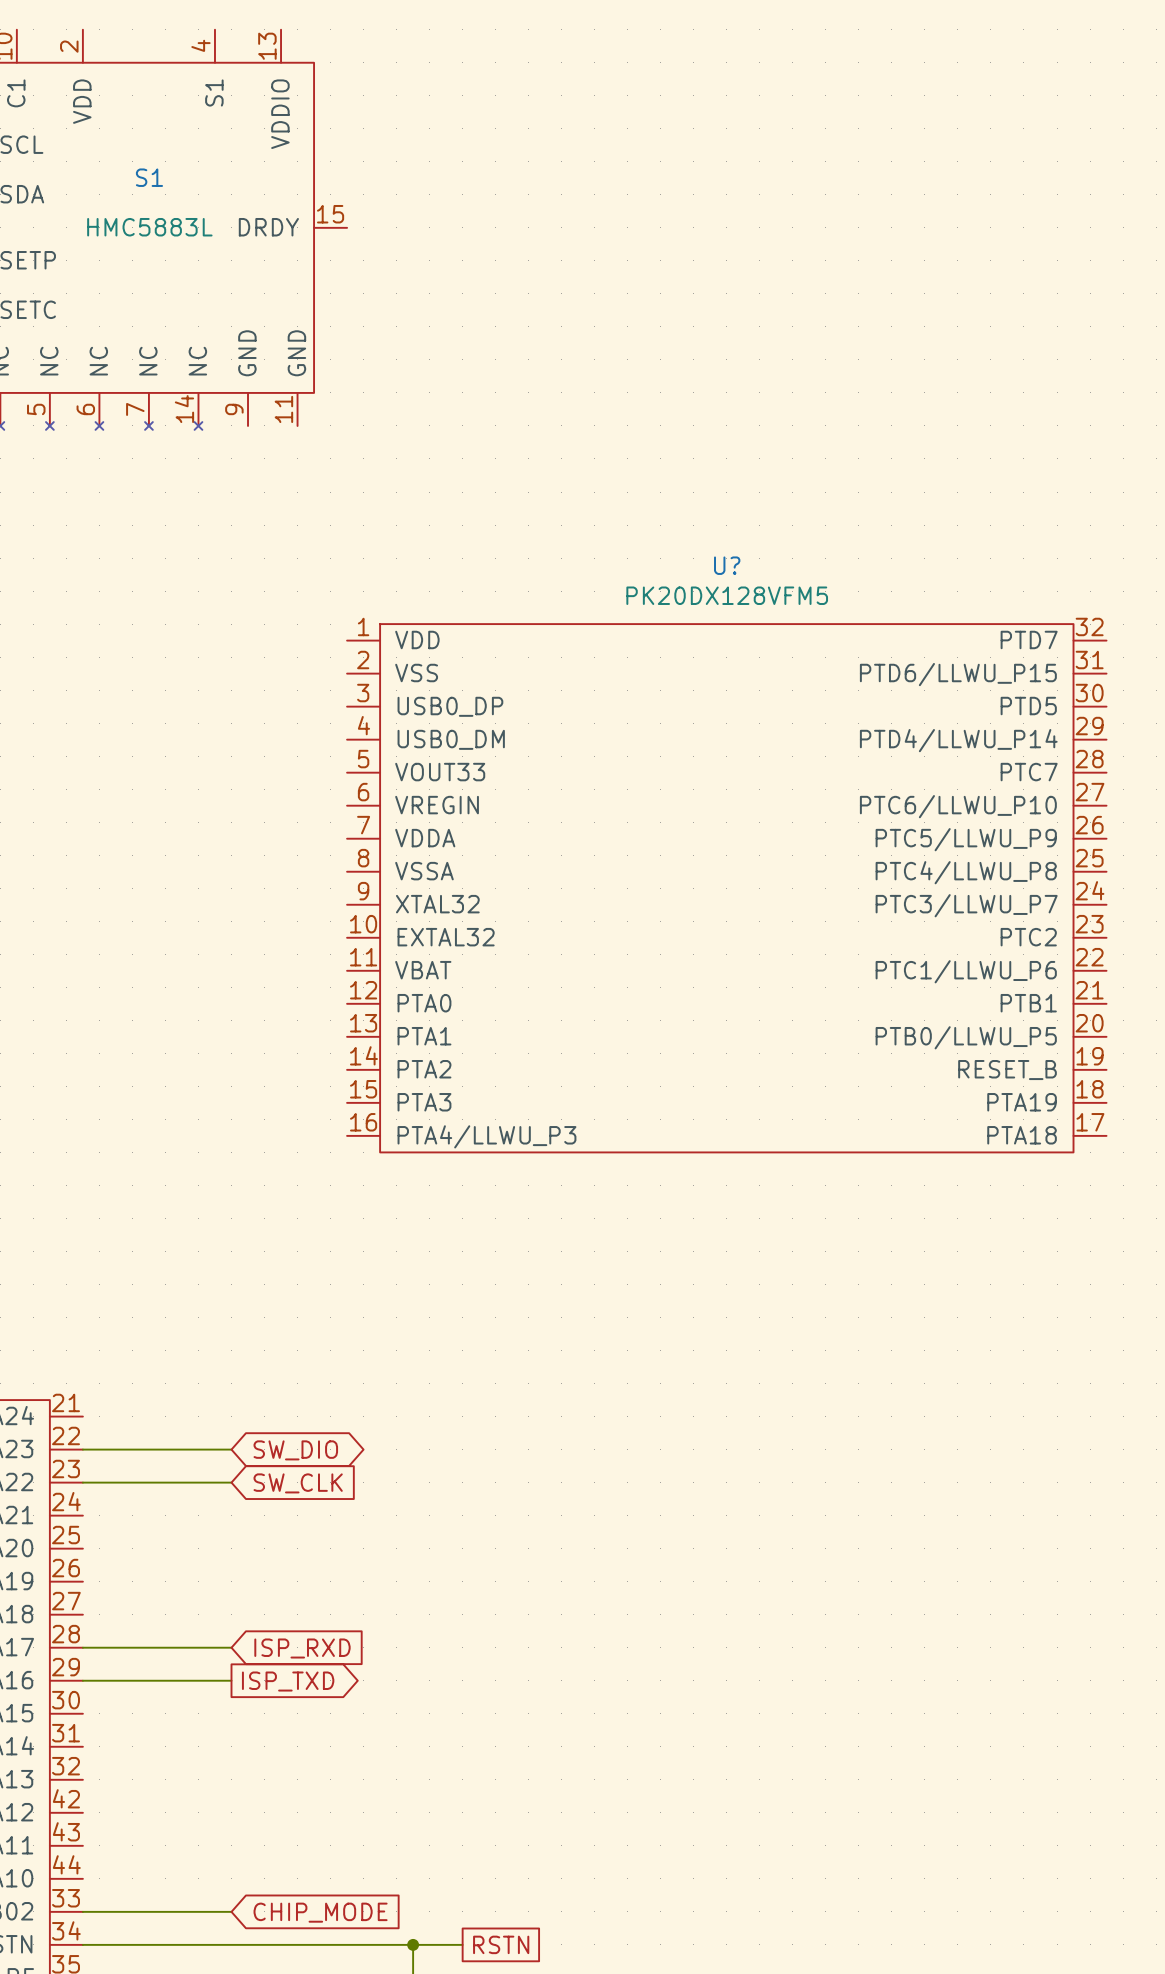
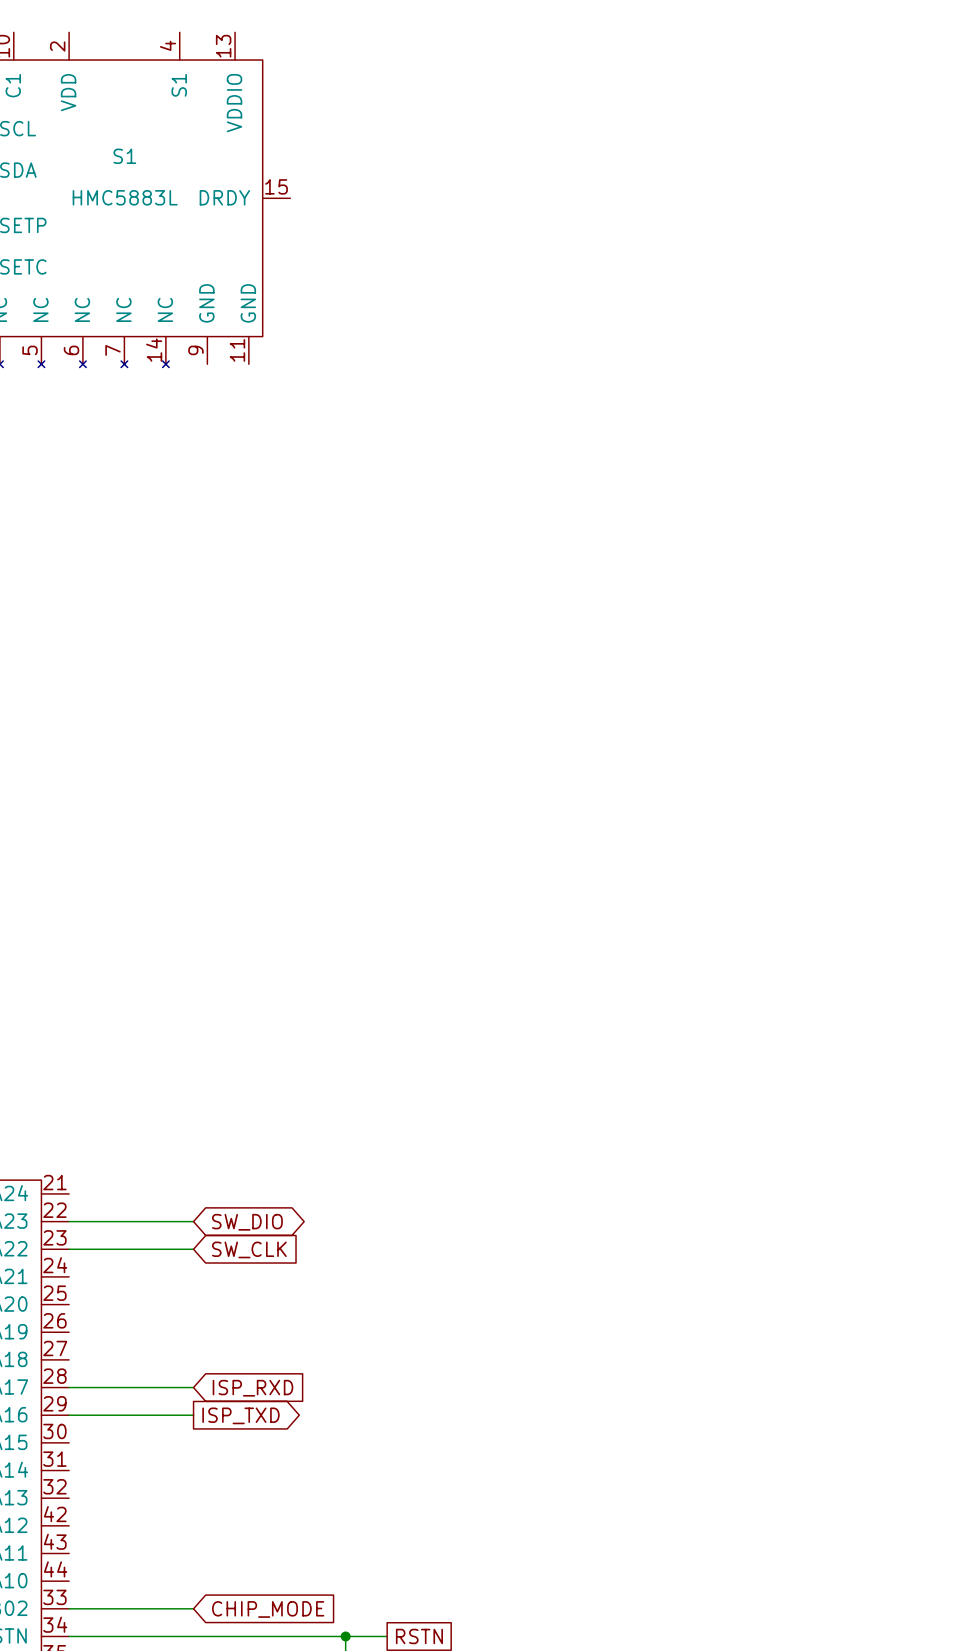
U?: PK20DX128VFM5 (726, 888) -> none

